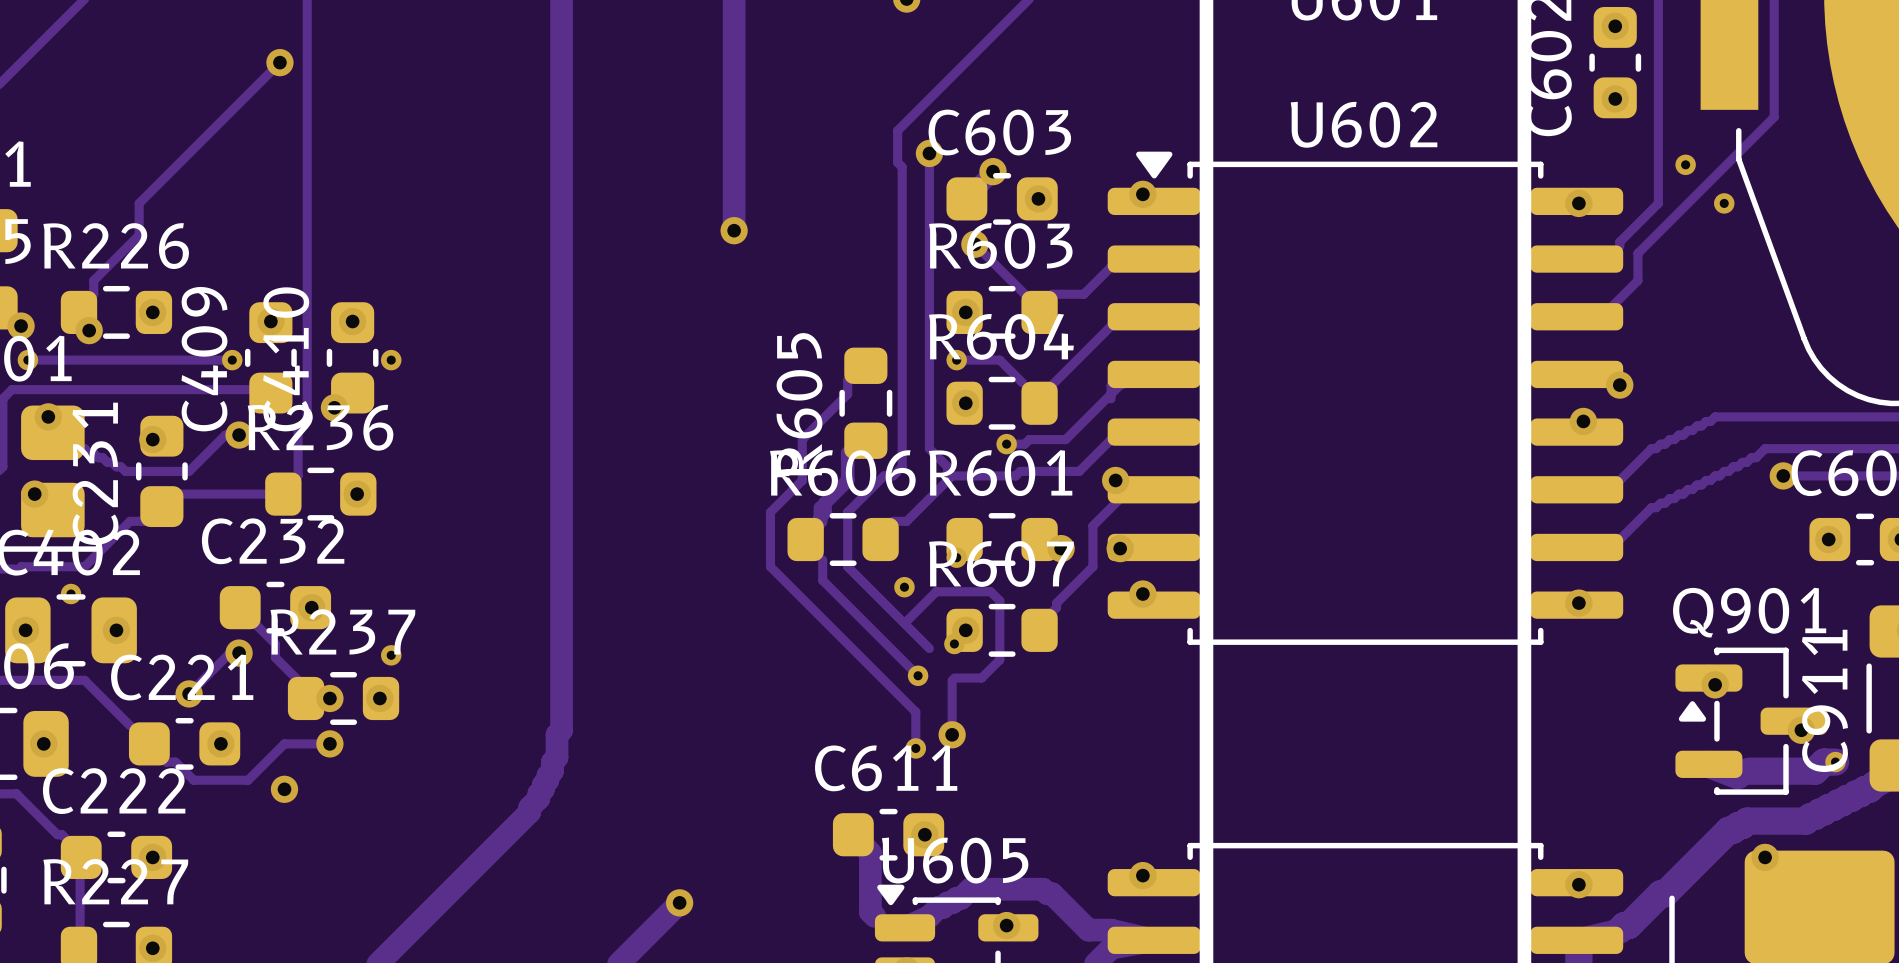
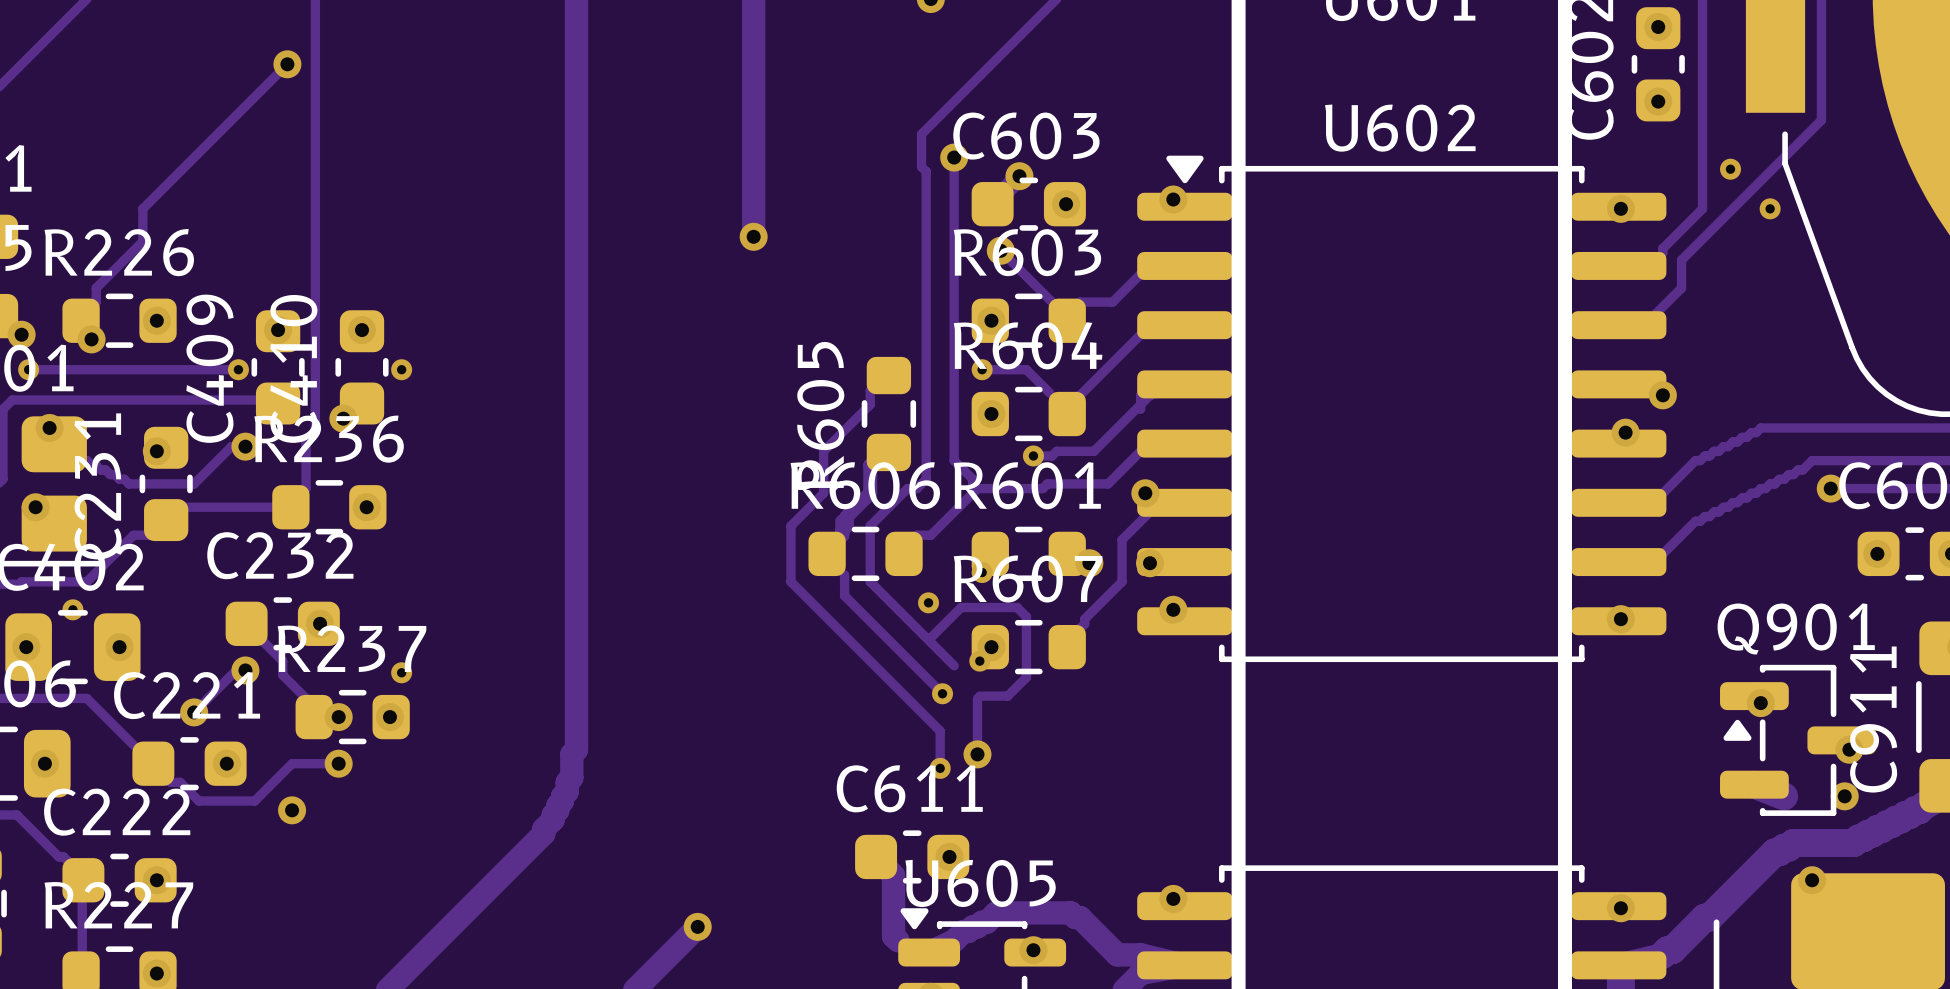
track: (1835, 762) (1824, 762) (1815, 771) (1749, 771) -> none
via: (1835, 762) -> none
via: none -> (1844, 796)

